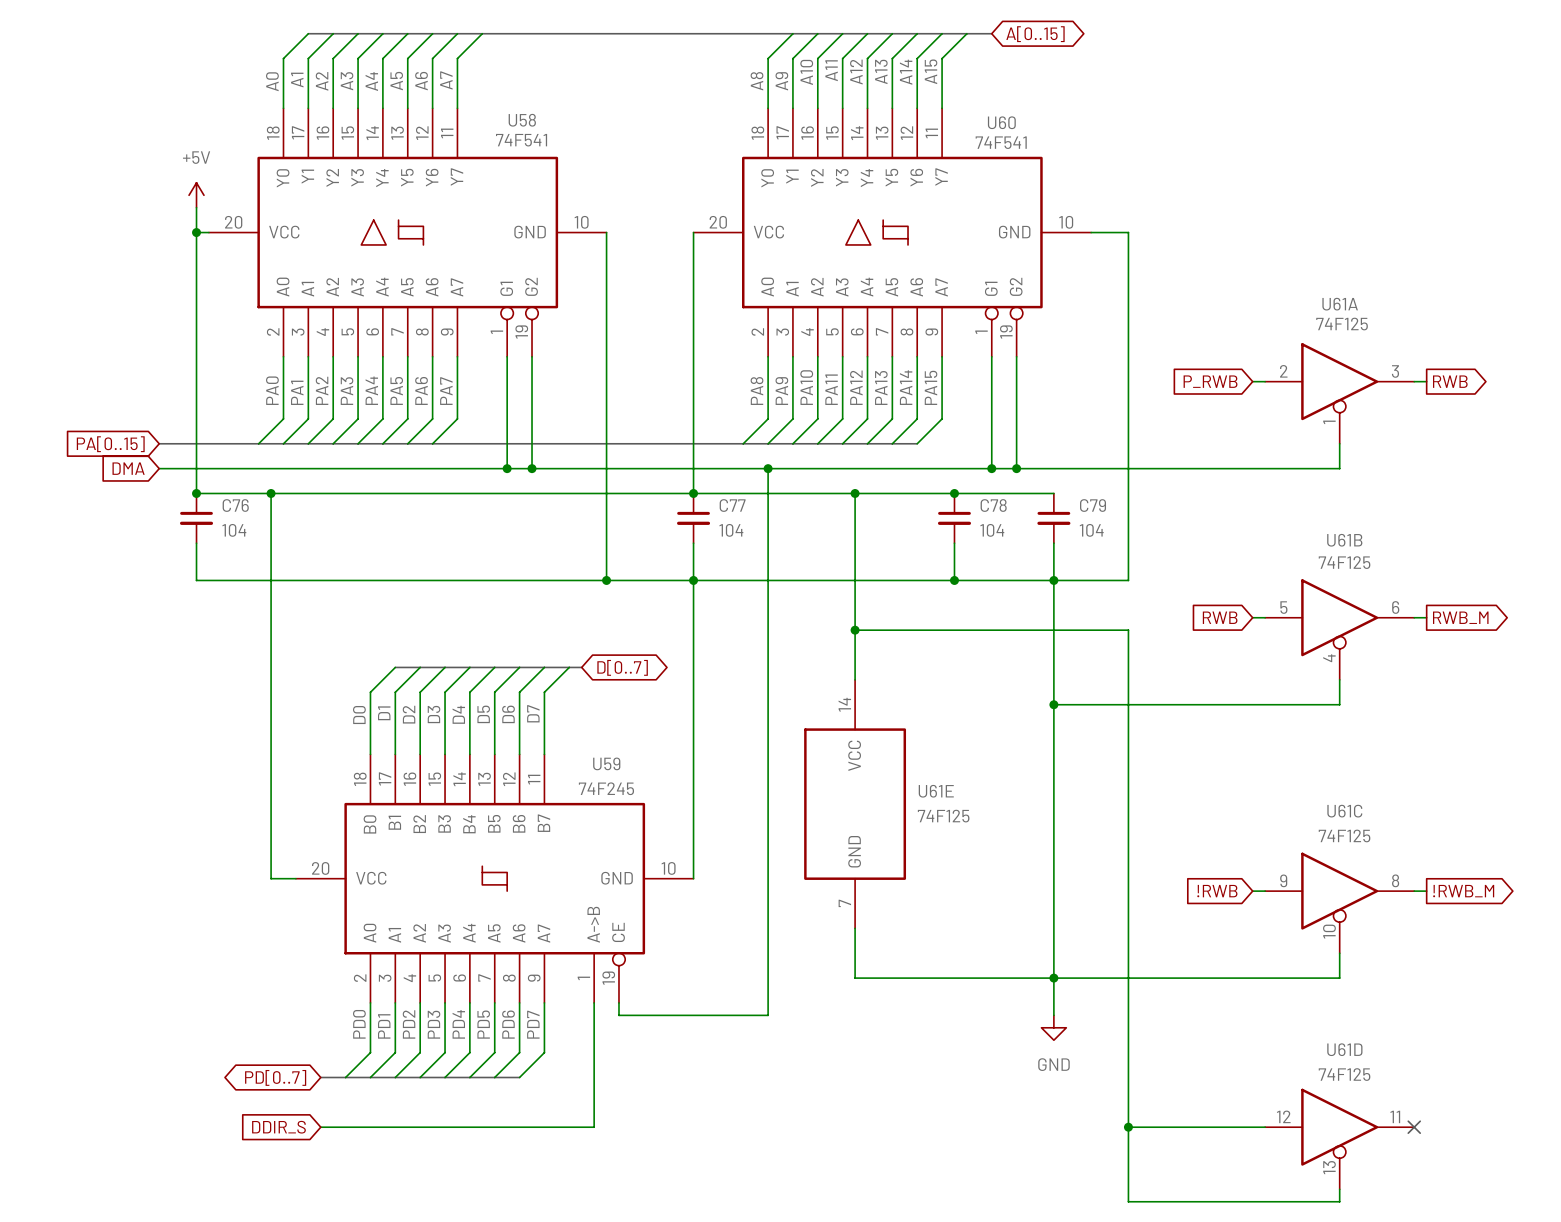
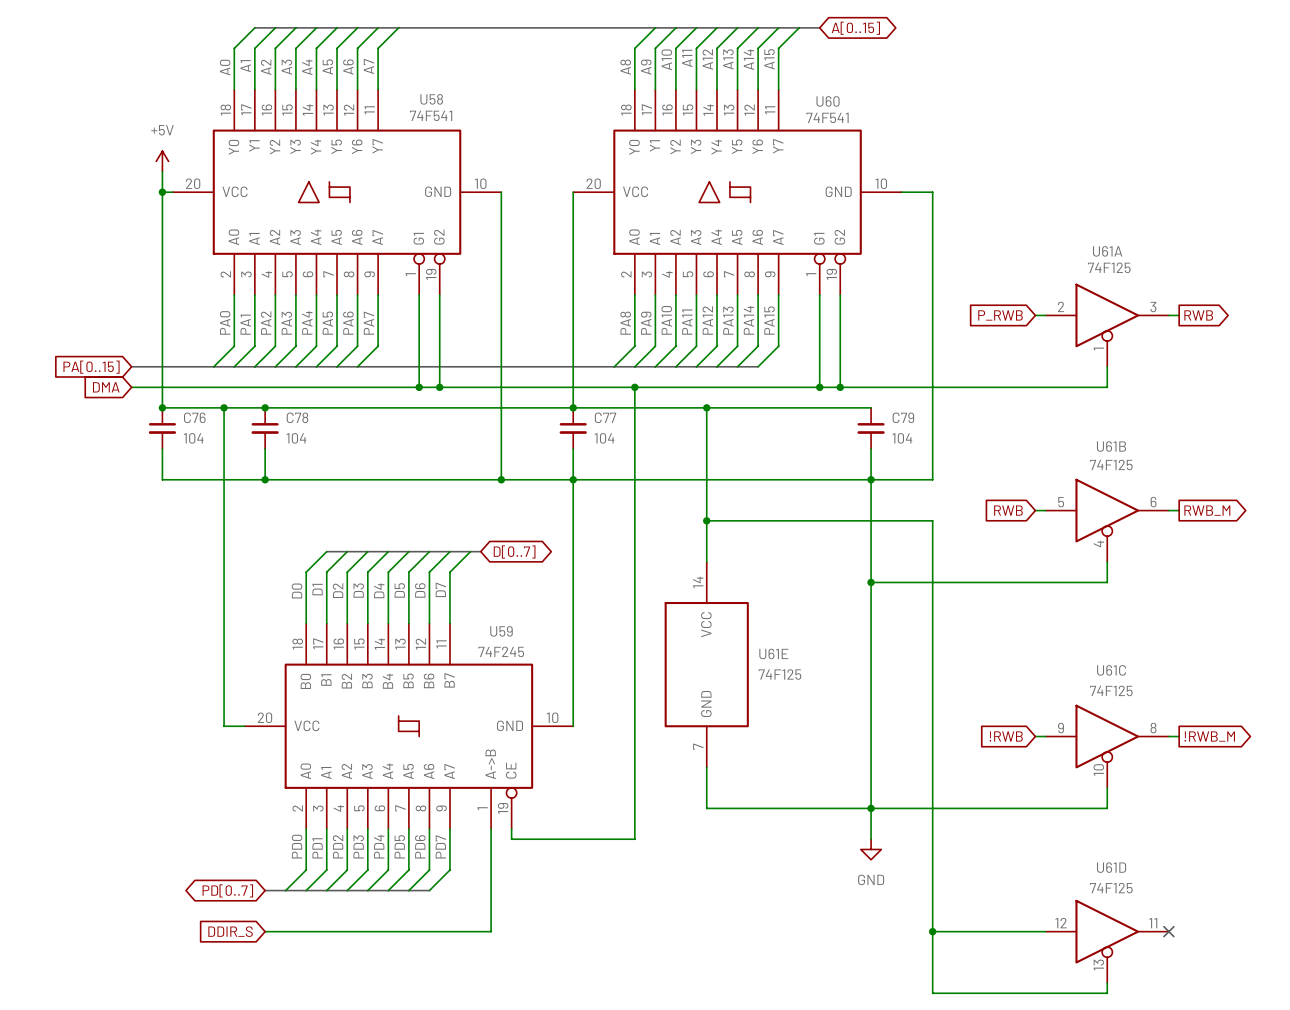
junction: none -> (265, 407)
junction: (954, 493) -> none
C78 position: (954, 518) -> (265, 428)
wire: none -> (265, 448) (265, 479)
wire: (954, 543) (954, 580) -> none
junction: none -> (265, 479)
junction: (954, 580) -> none

